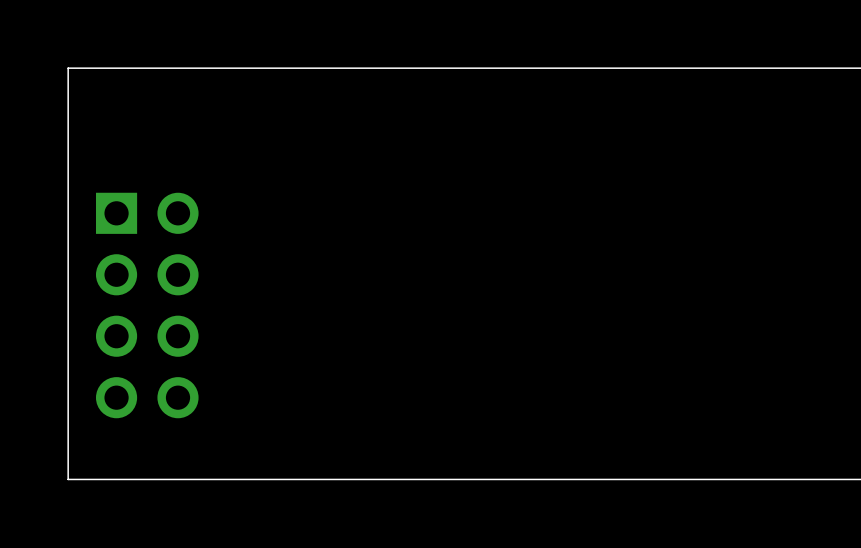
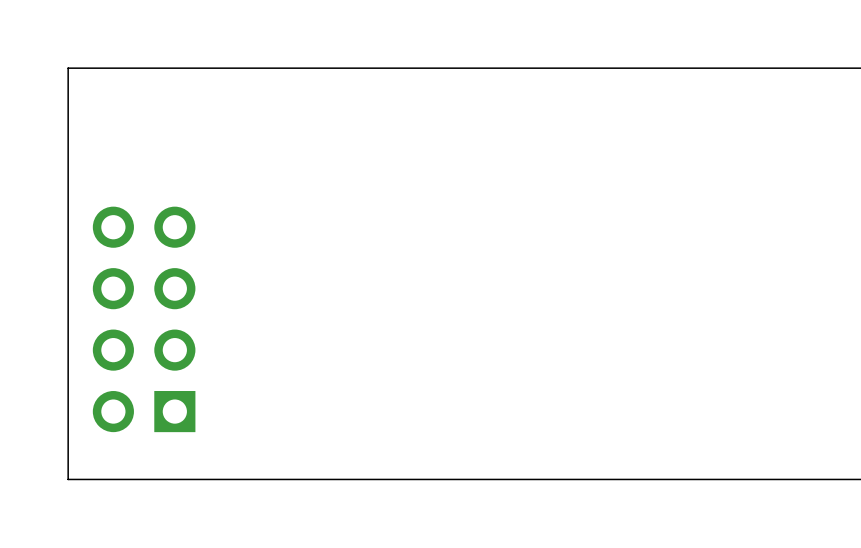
part rotation: 0° (147, 305) -> 180° (144, 319)

